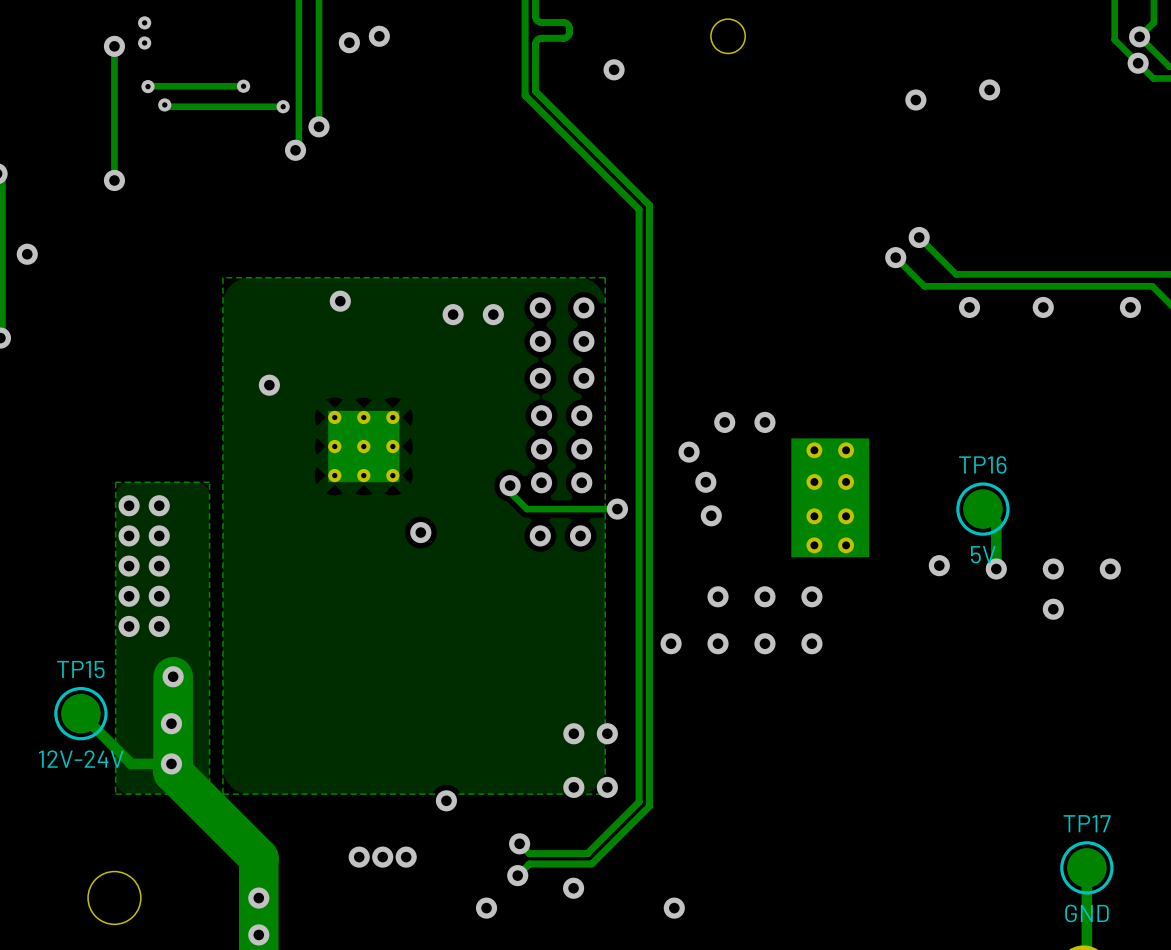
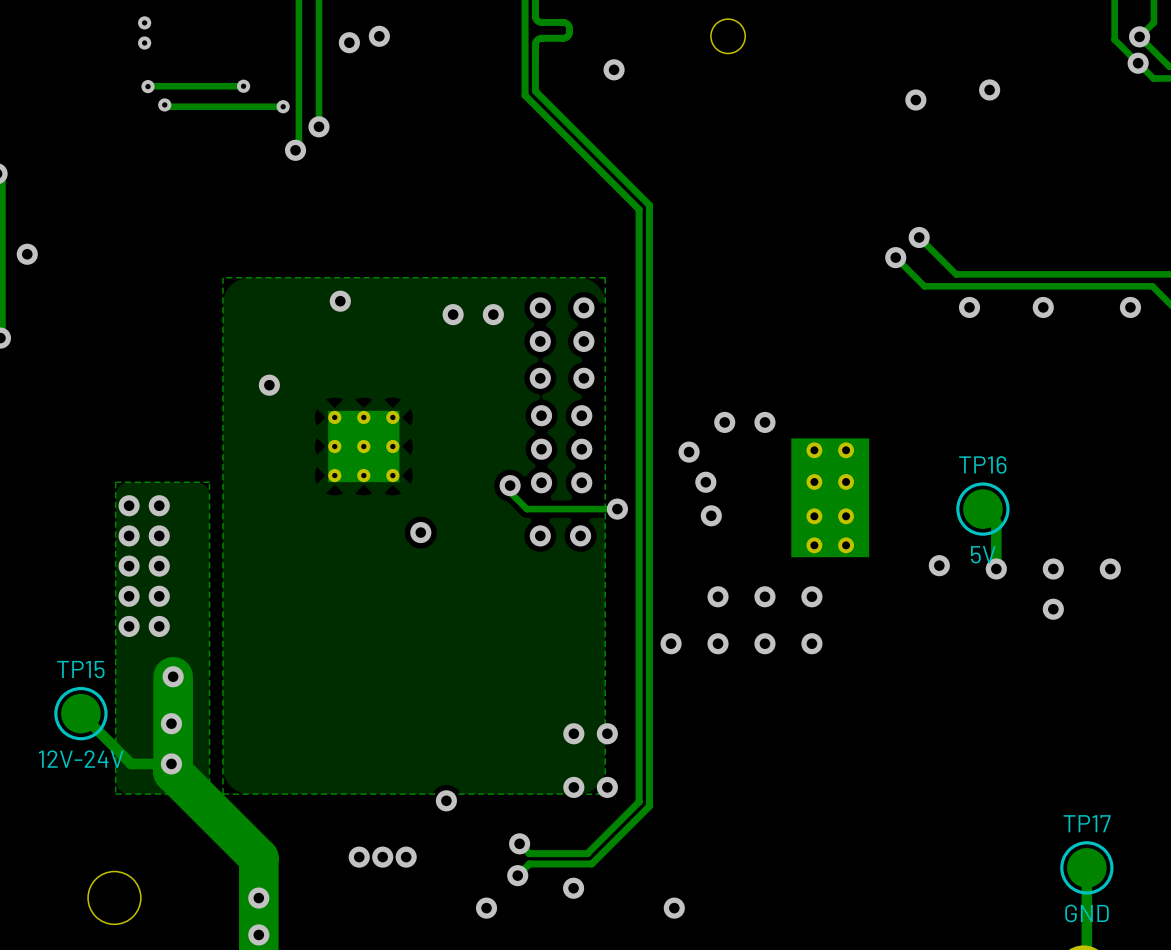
track: (114, 46) (114, 180) -> none
via: (114, 46) -> none
via: (114, 180) -> none

